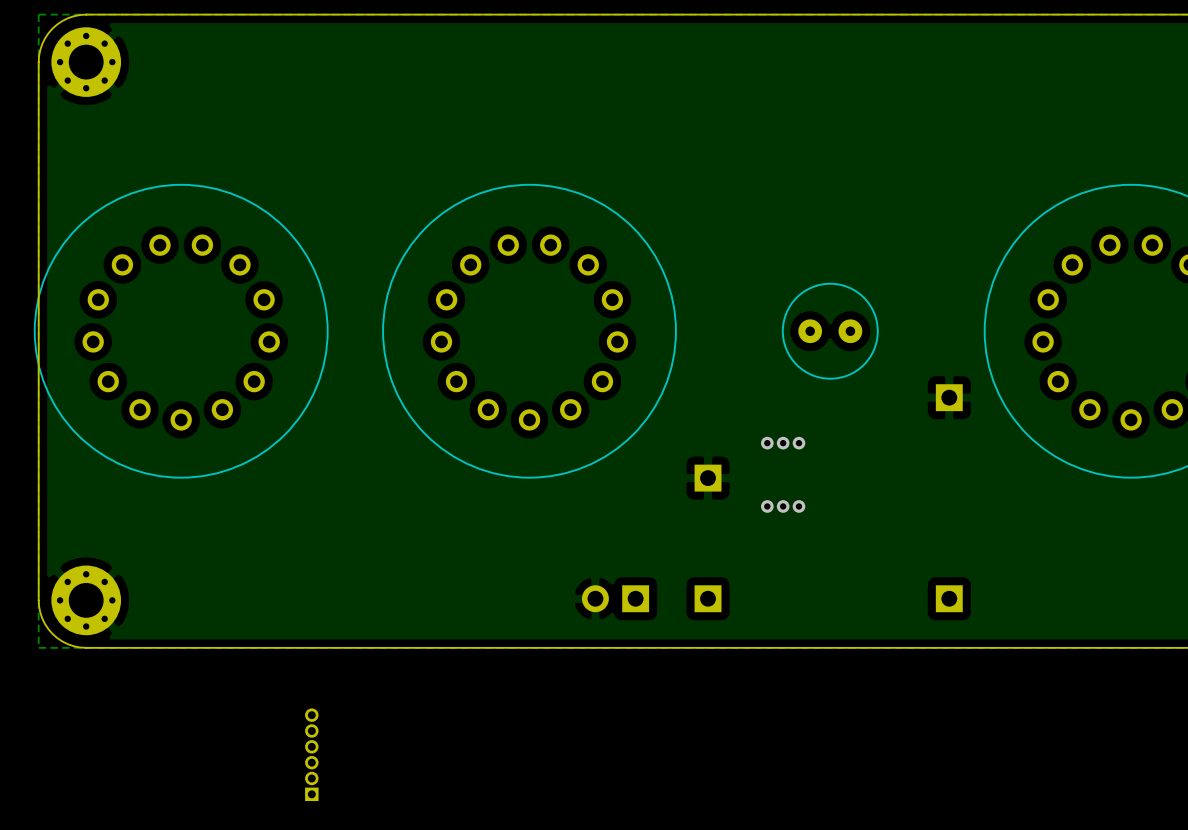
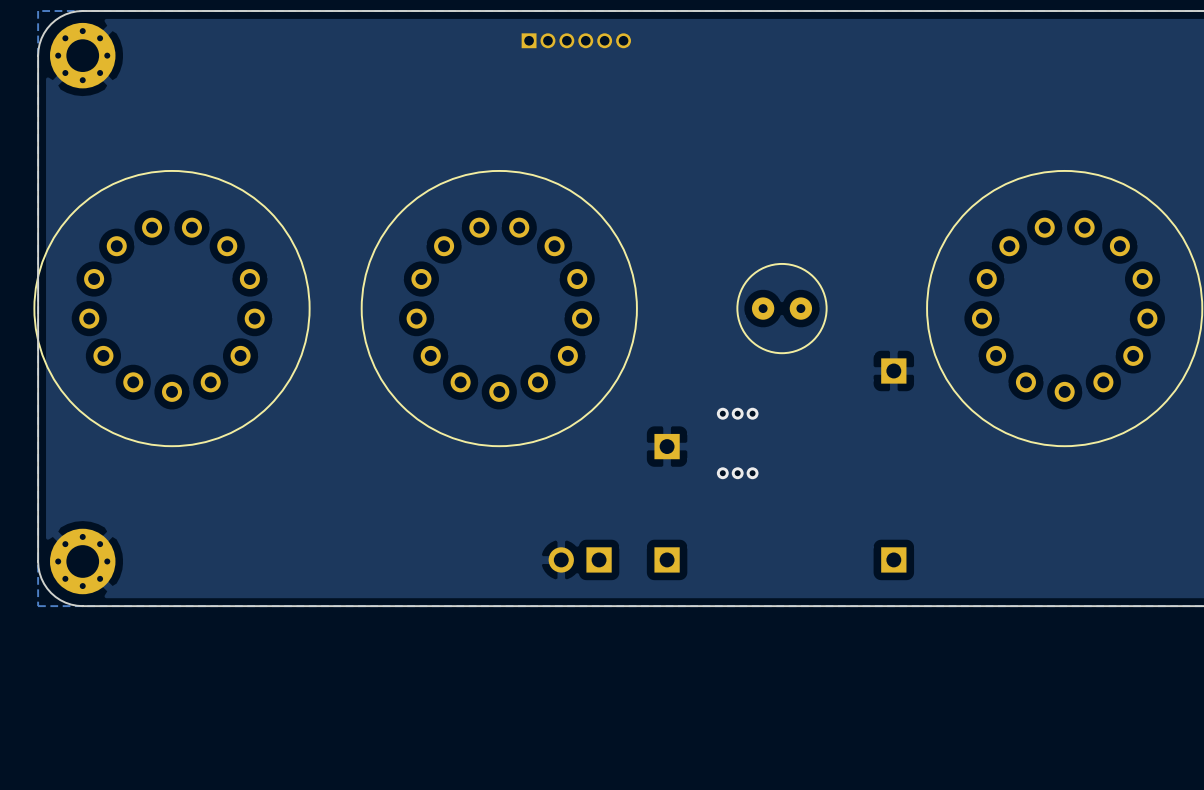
part: none -> (576, 40)
part: (311, 754) -> none

